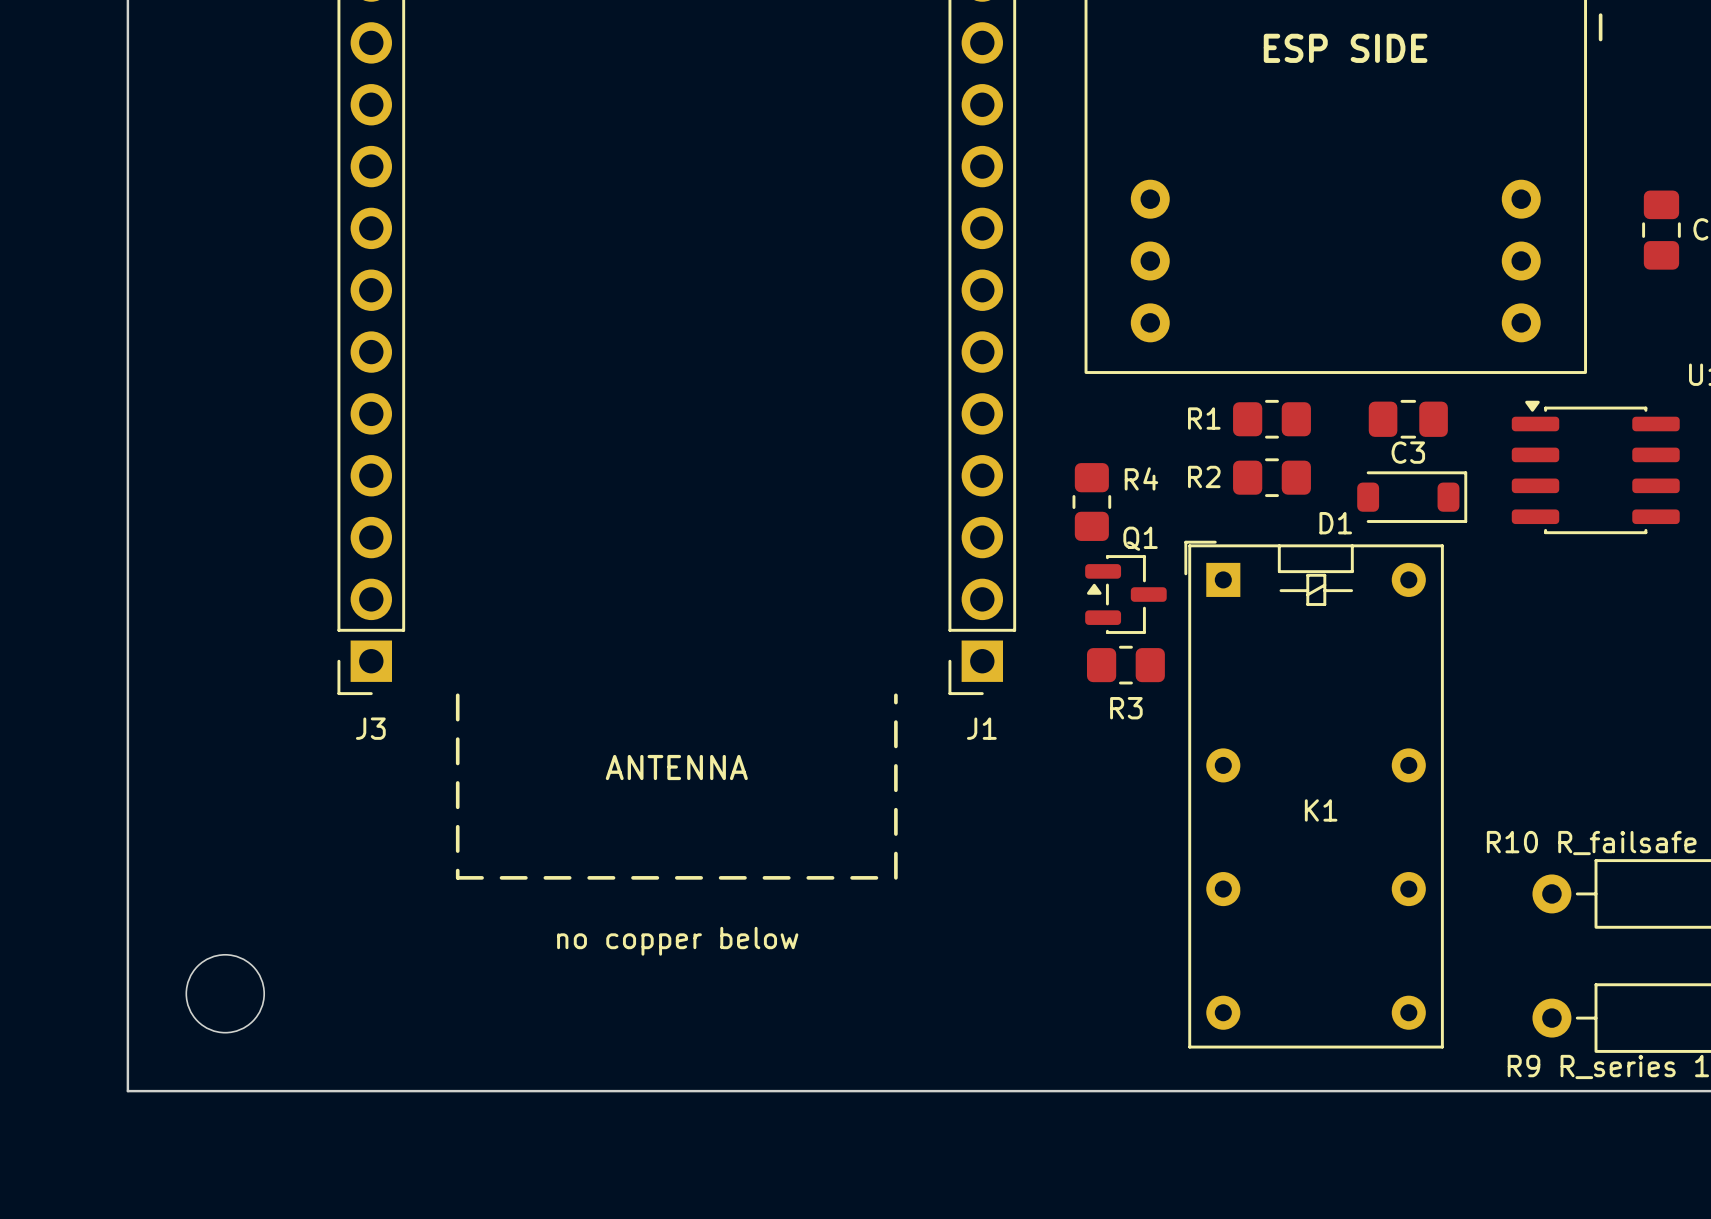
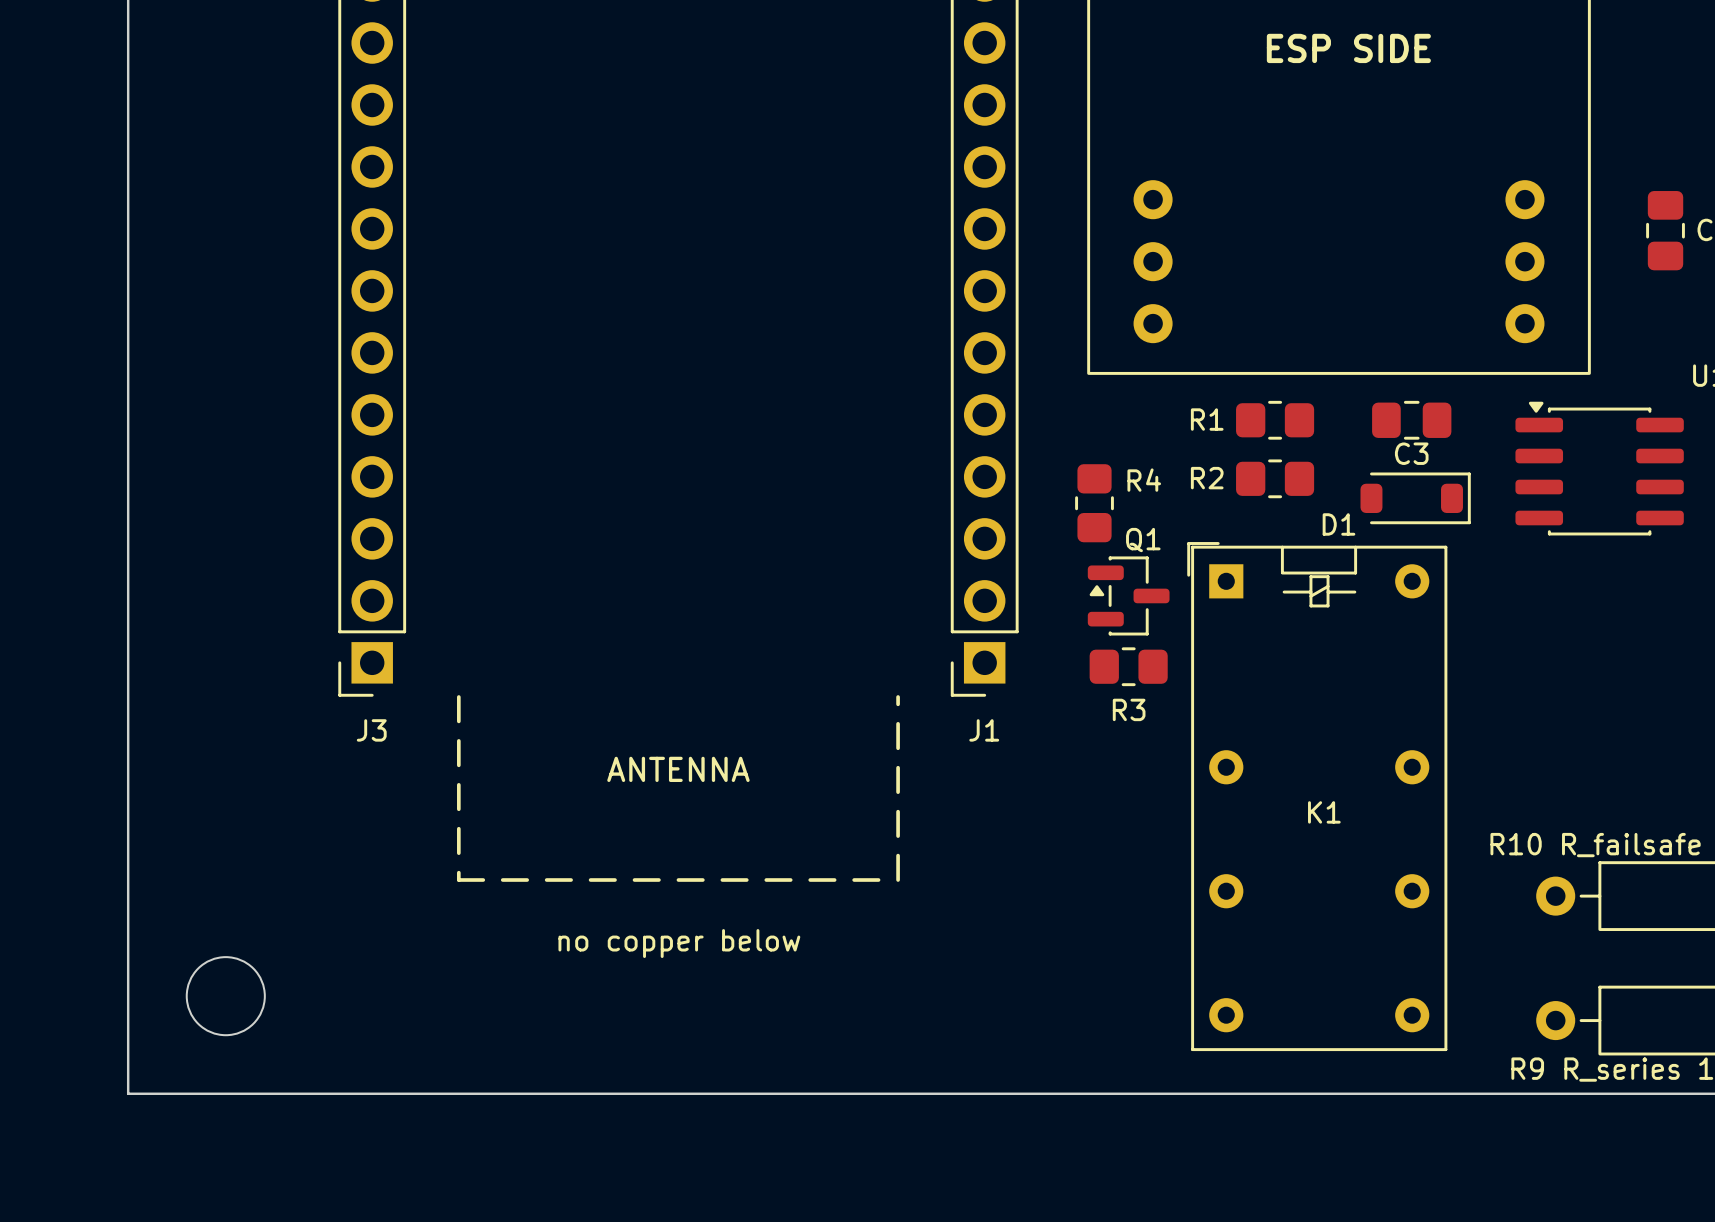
line: (1600, 15) (1600, 39) -> none

